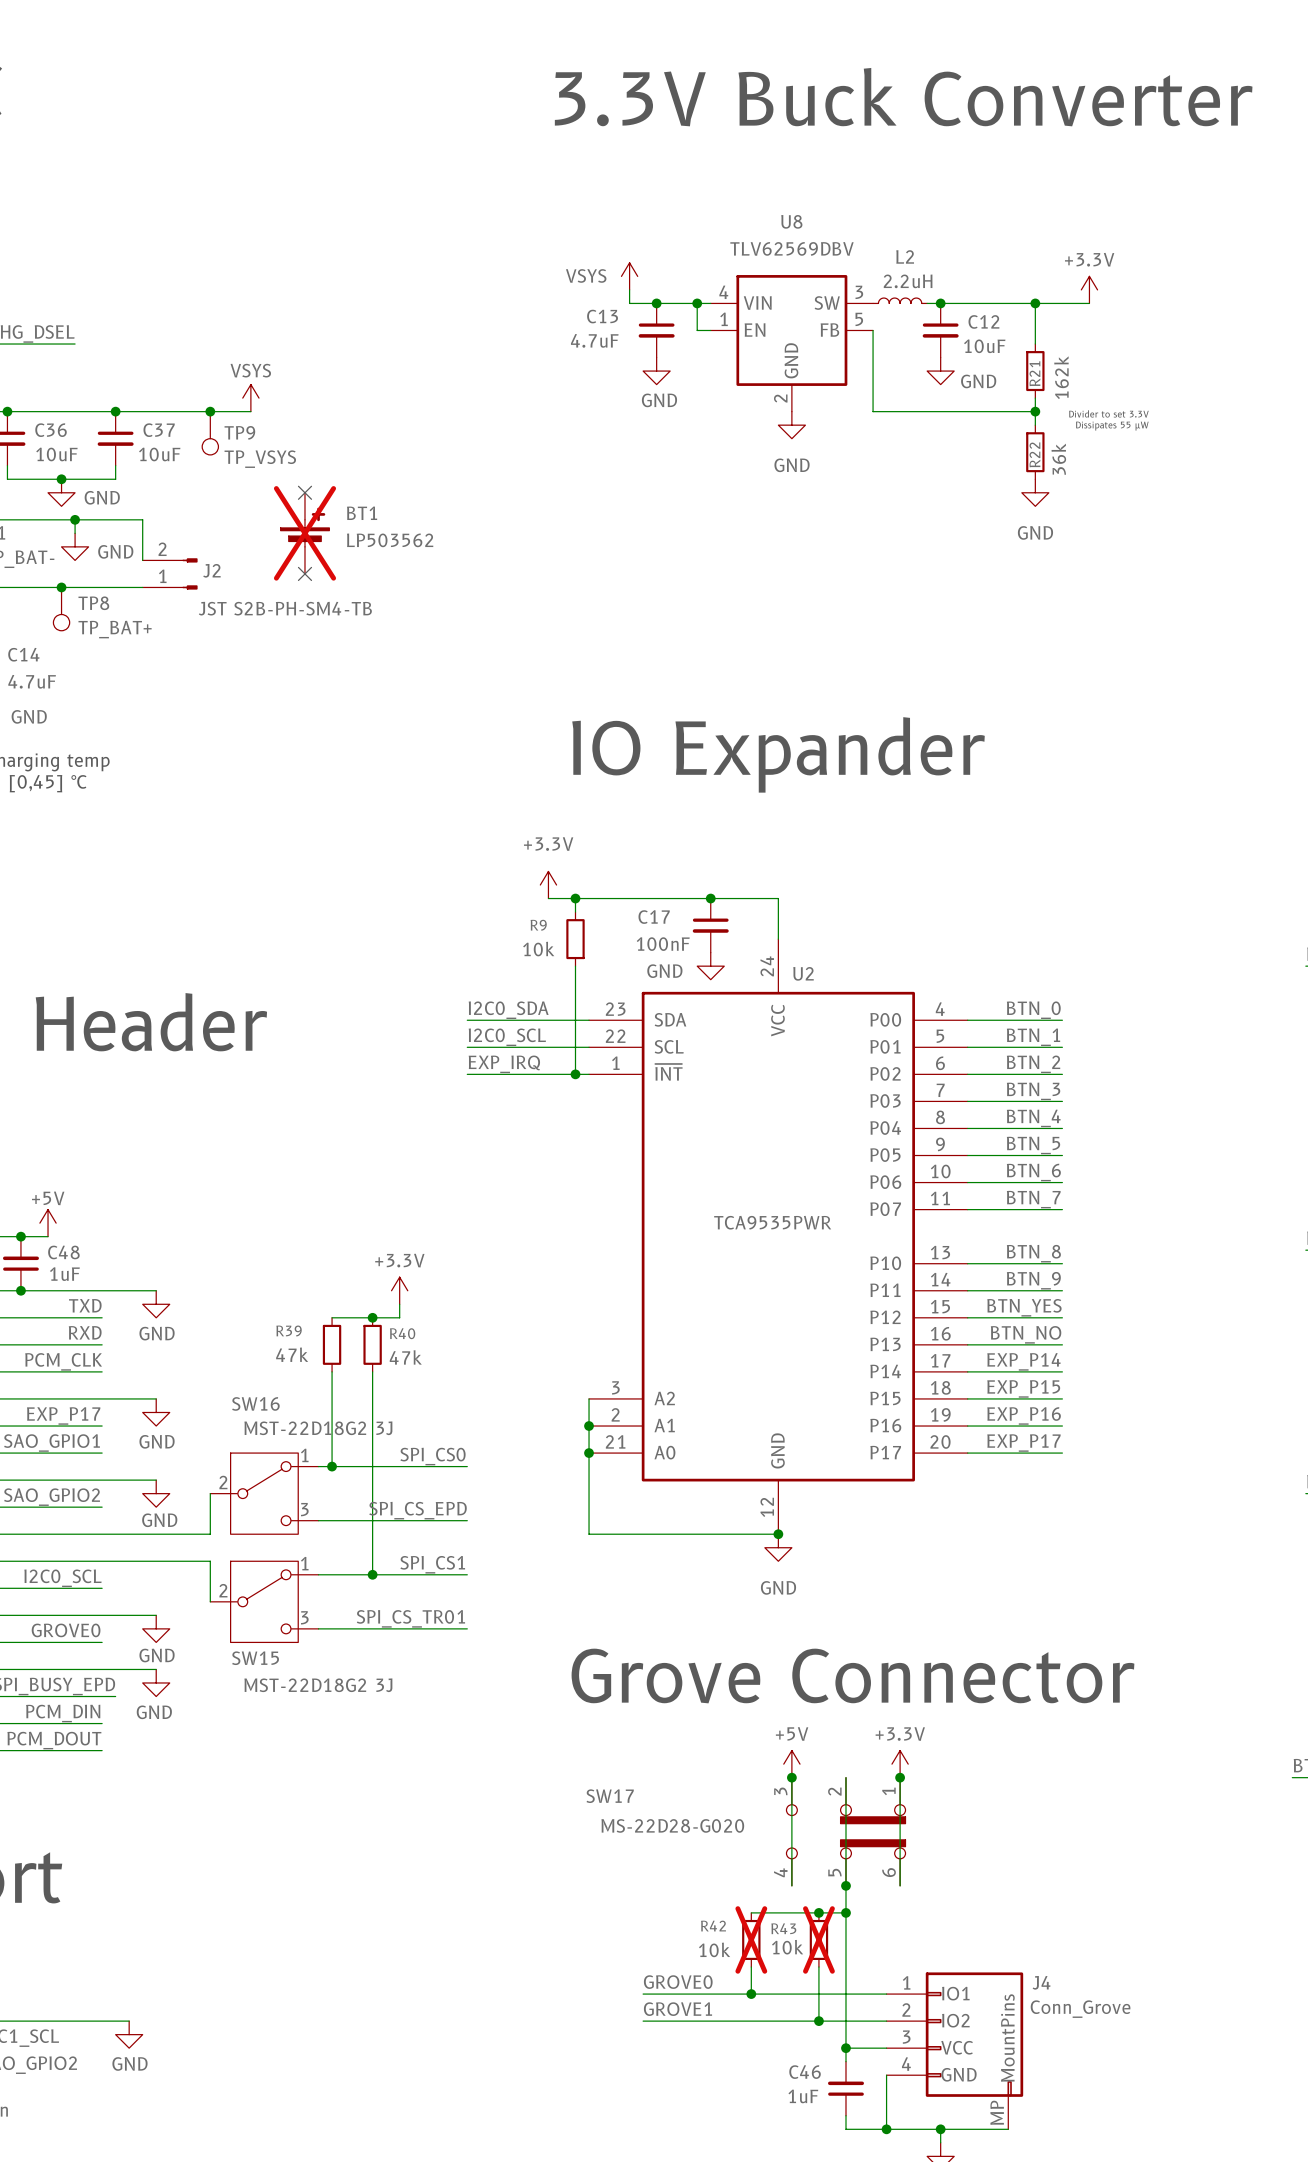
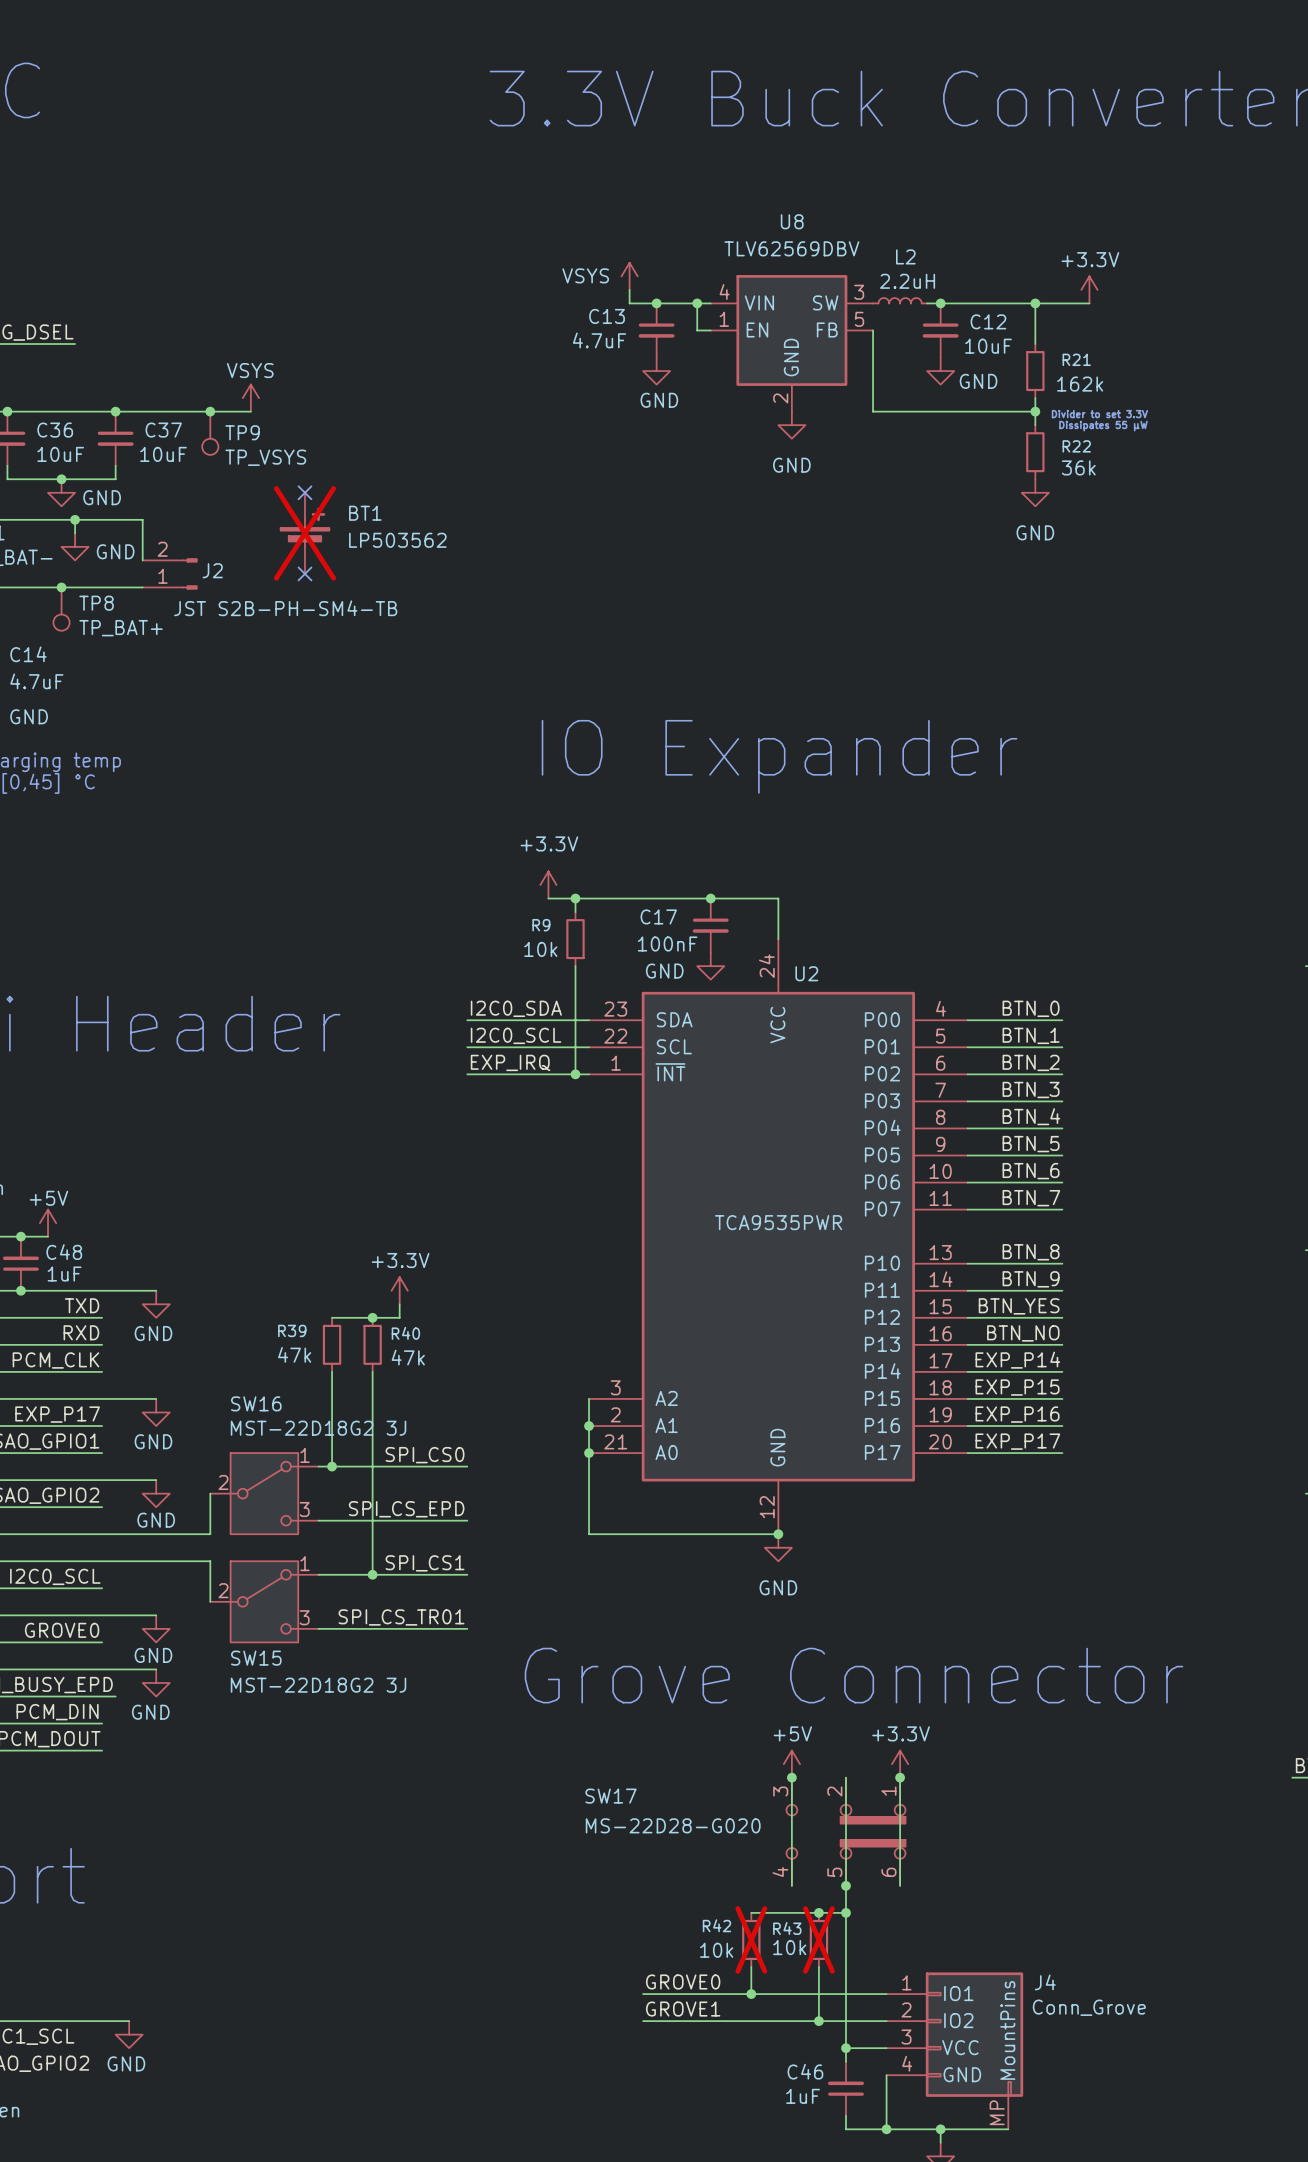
R21 name rotation: 0° (1034, 373) -> 90° clockwise (1076, 359)
R21 name position: R21 (1034, 373) -> R21 (1076, 359)
R21 value rotation: 0° (1061, 377) -> 90° clockwise (1080, 384)
R22 name rotation: 0° (1034, 454) -> 90° clockwise (1076, 446)
R22 name position: R22 (1034, 454) -> R22 (1076, 446)
R22 value rotation: 0° (1058, 459) -> 90° clockwise (1078, 467)

